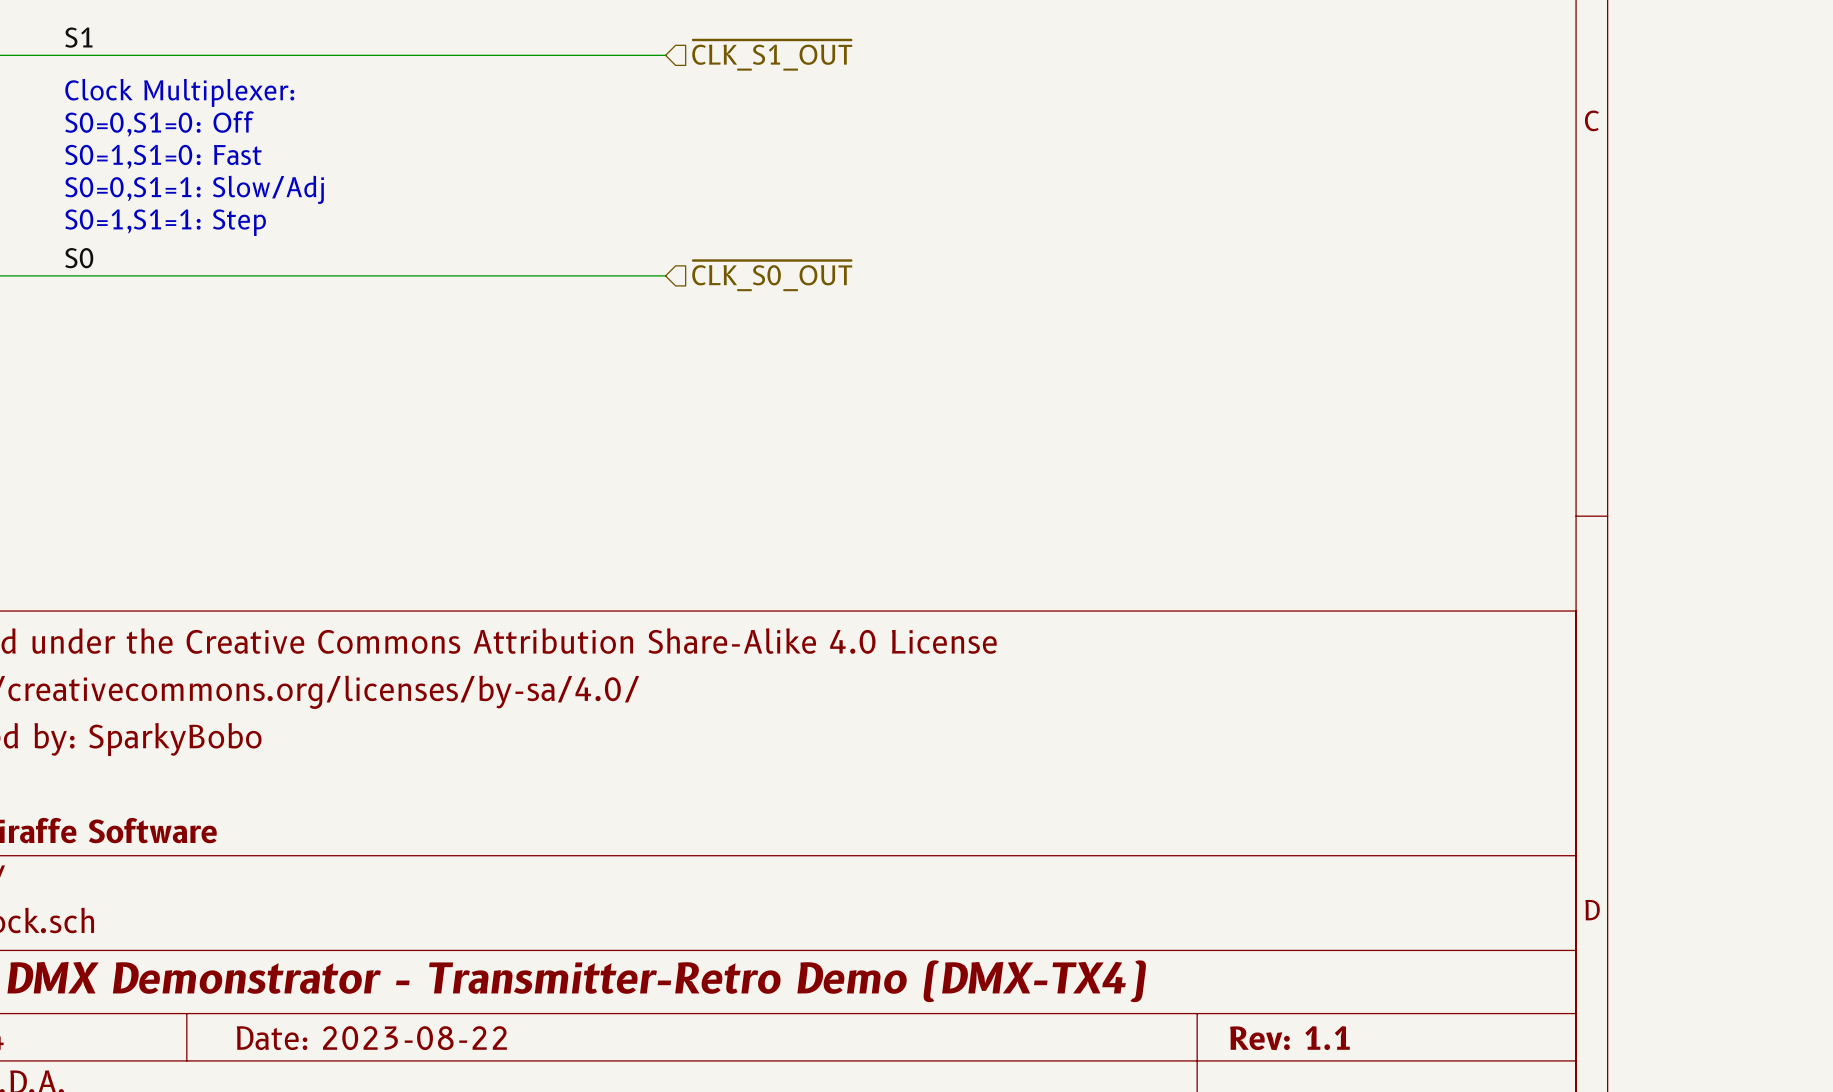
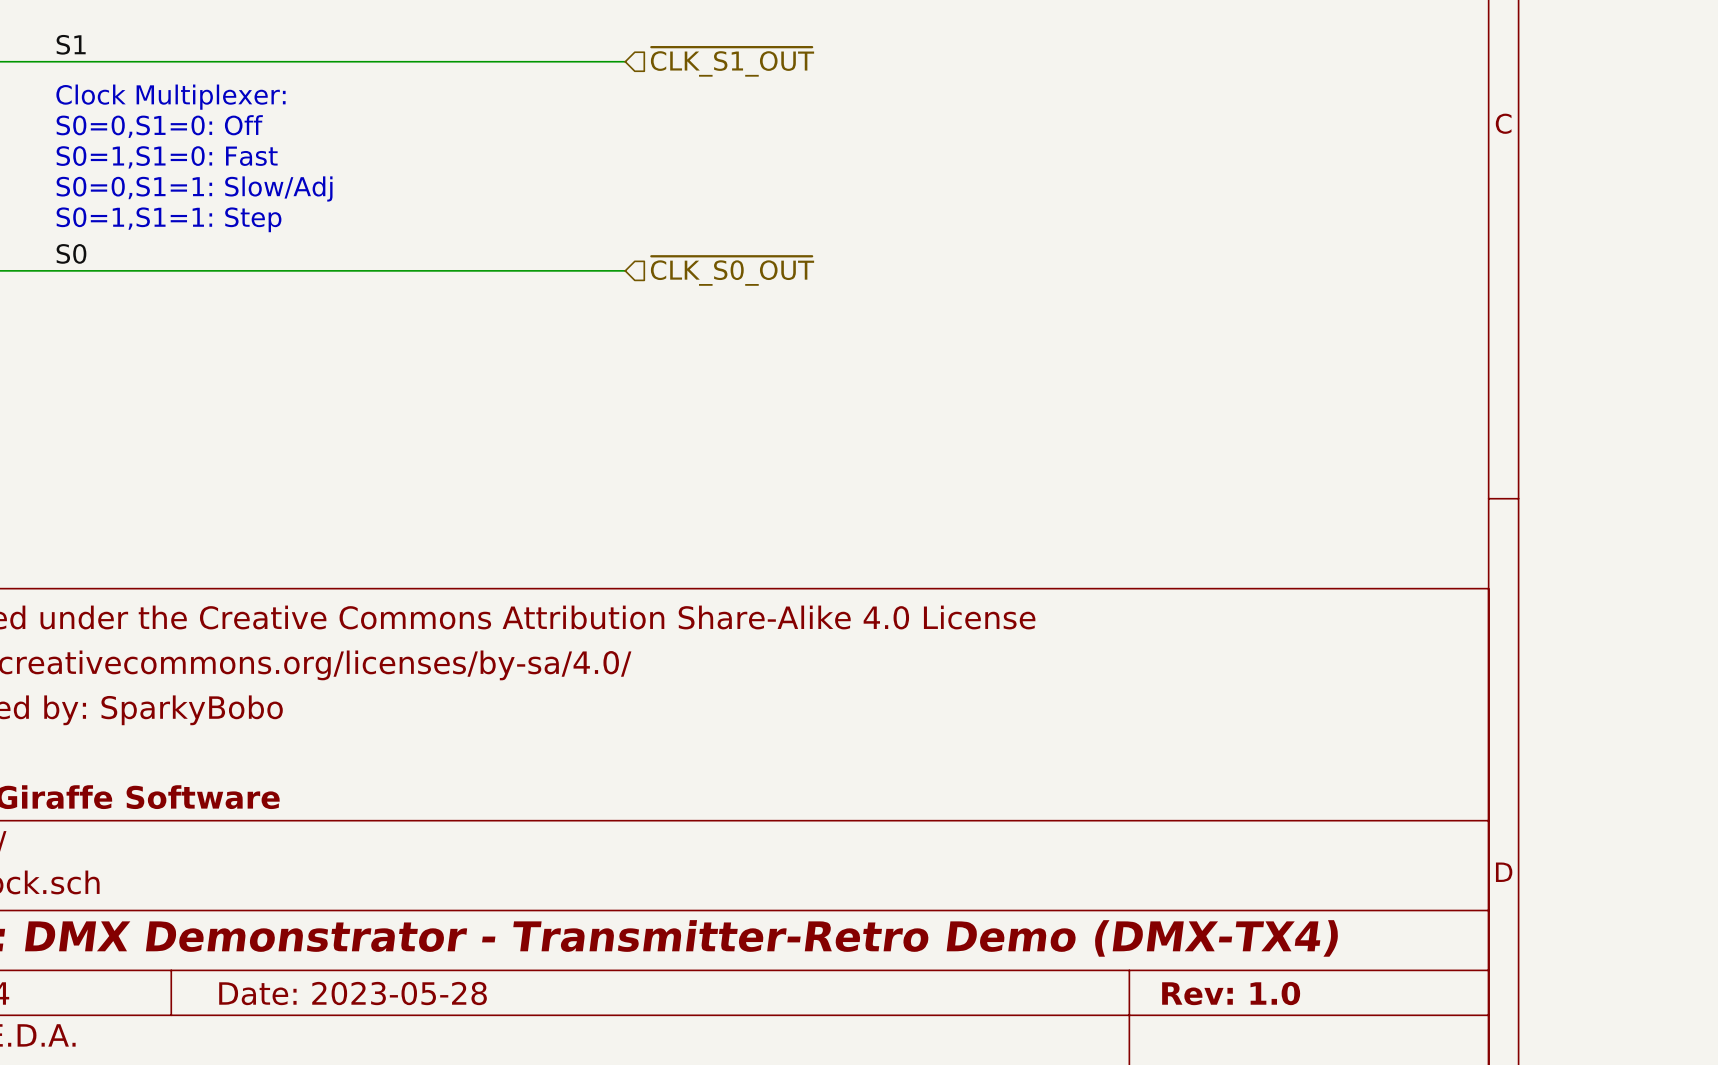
title block: Date: 2023-08-22 (371, 1038) -> Date: 2023-05-28 (353, 993)
title block: Rev: 1.1 (1289, 1038) -> Rev: 1.0 (1231, 993)

